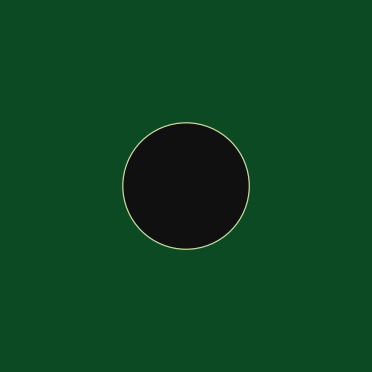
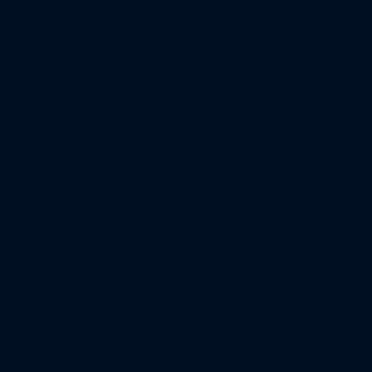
part: (186, 186) -> none

